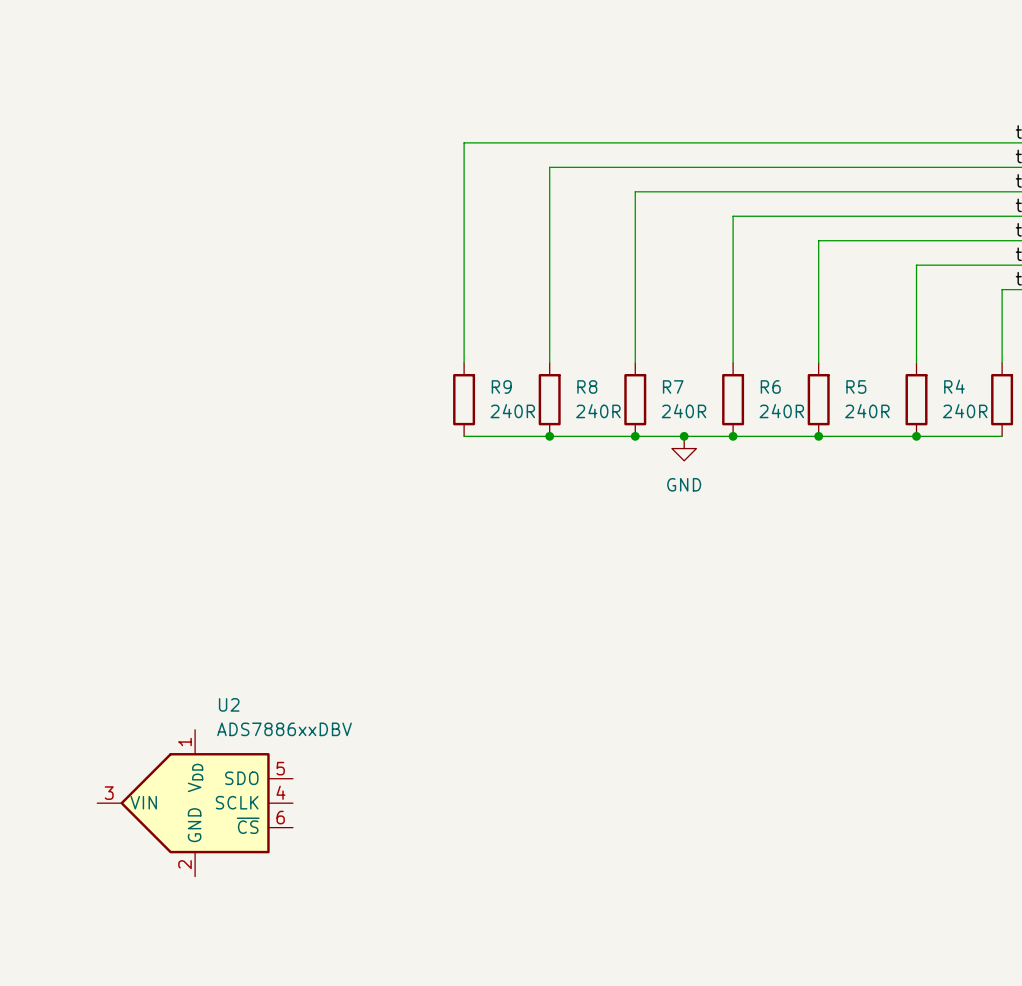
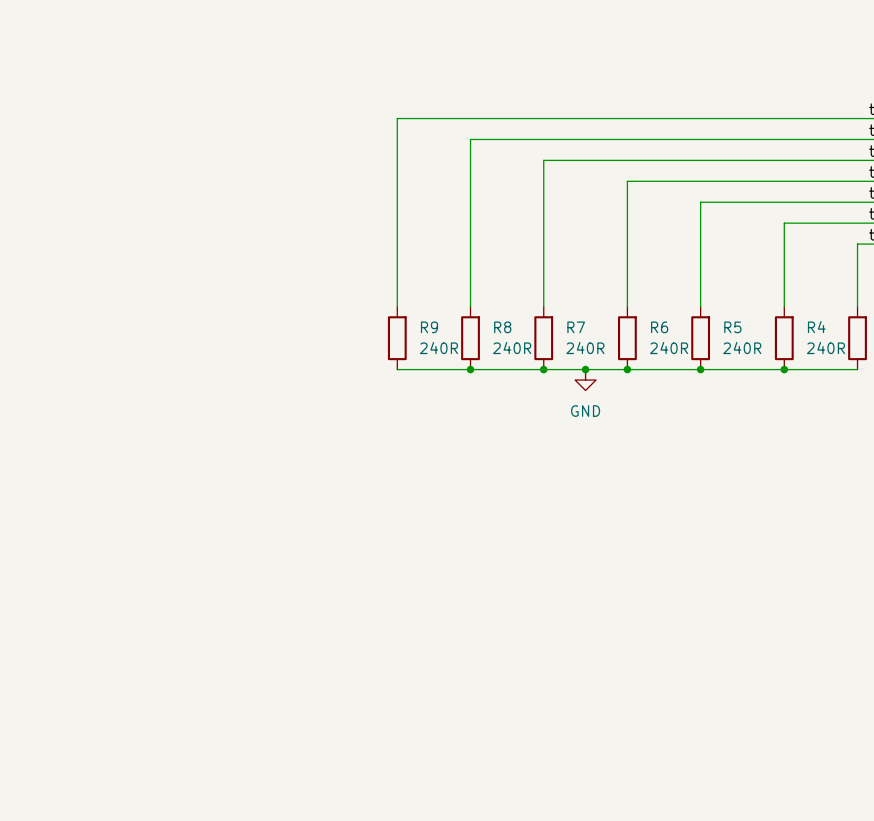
U2: ADS7886xxDBV (195, 803) -> none

